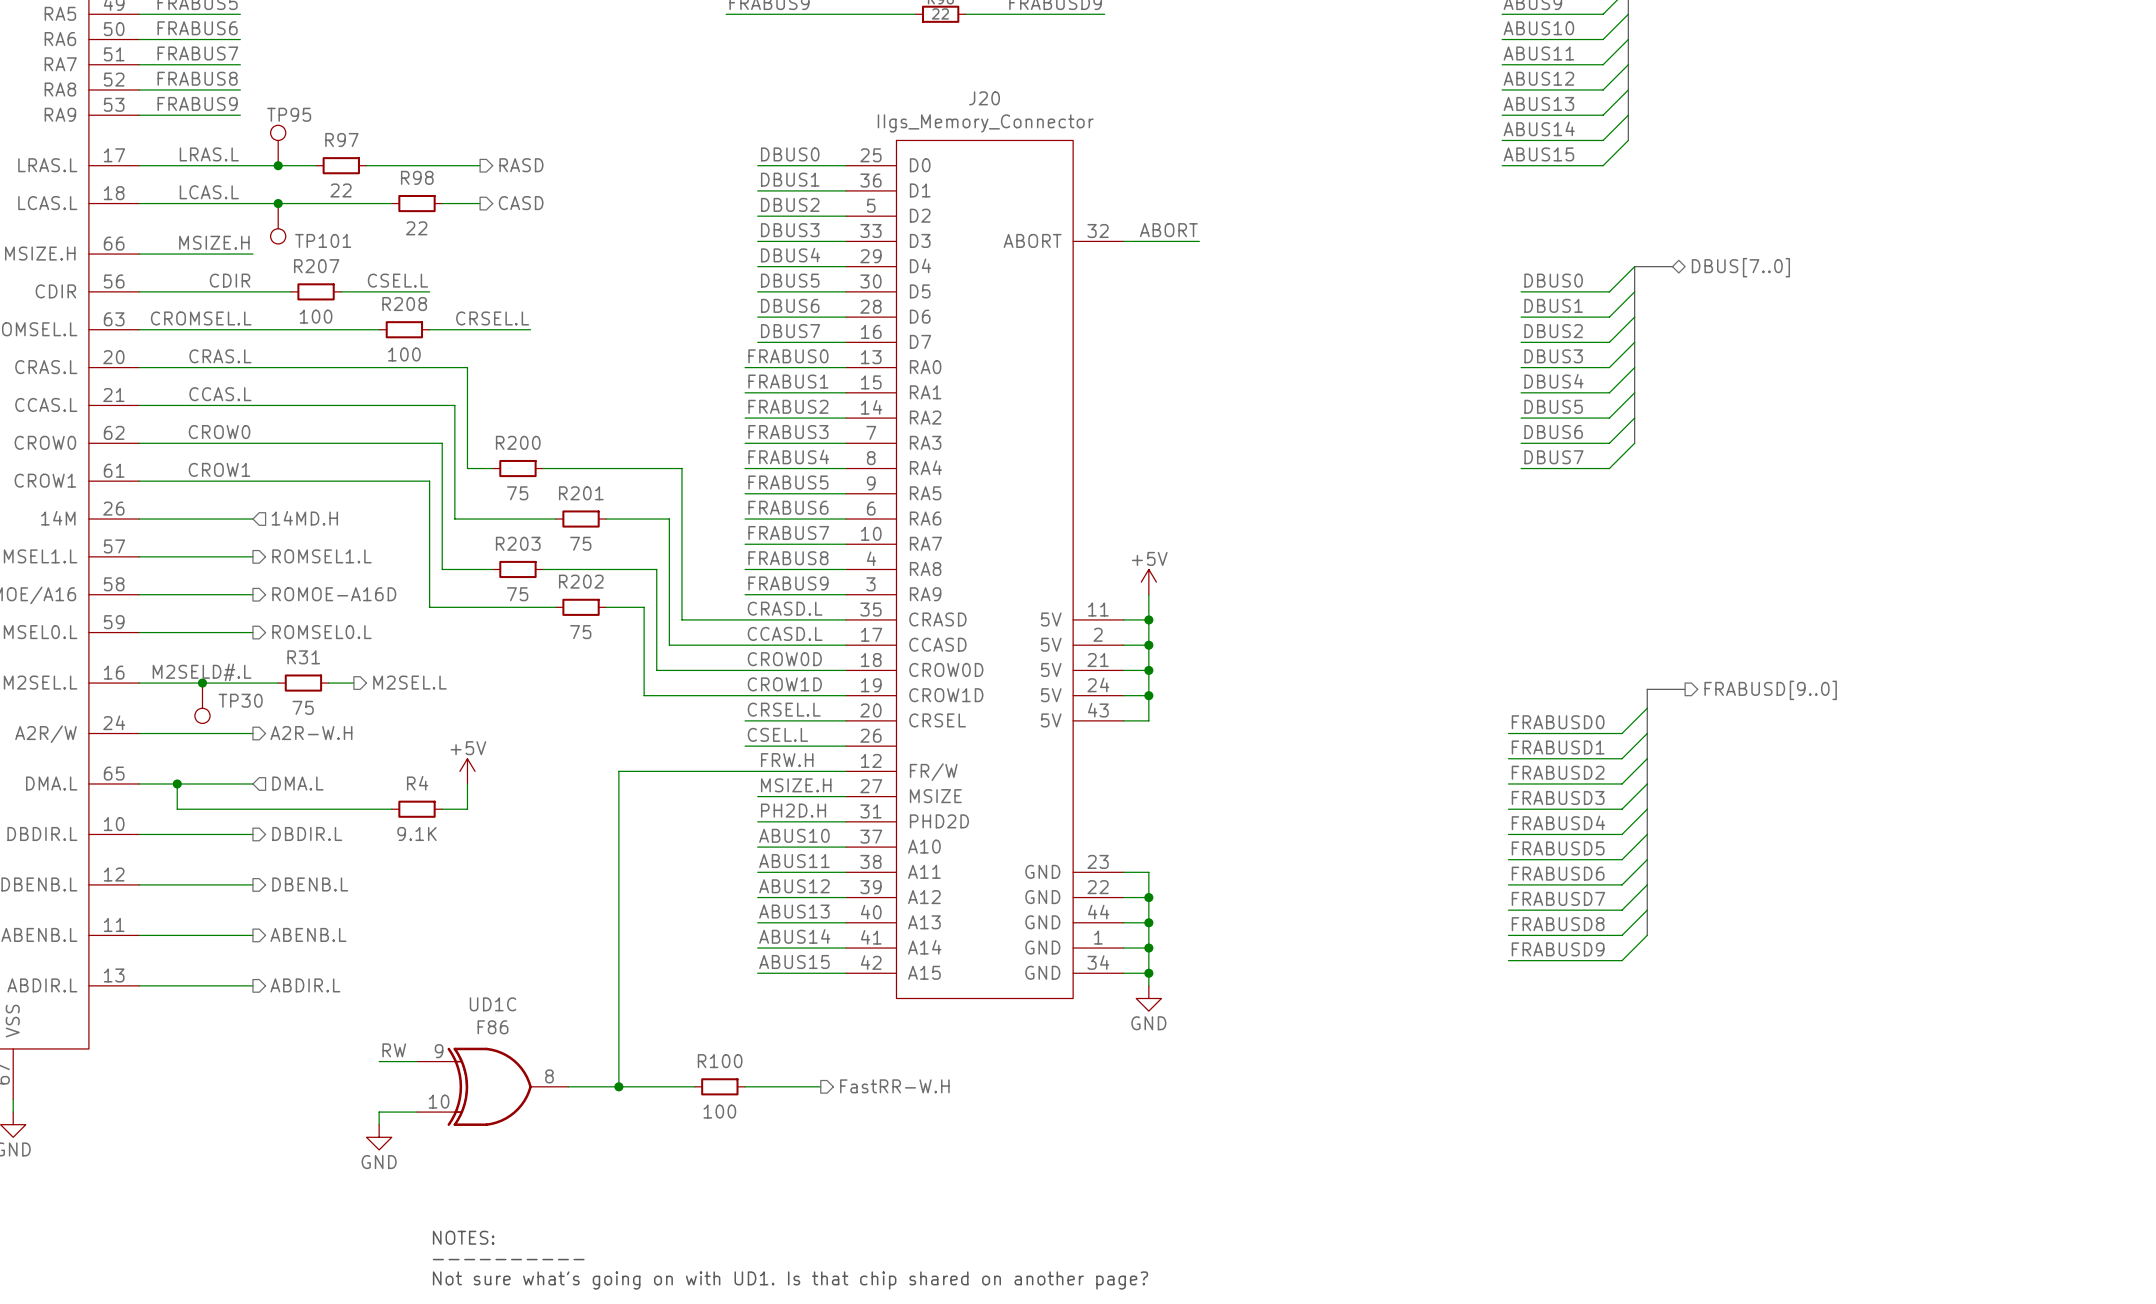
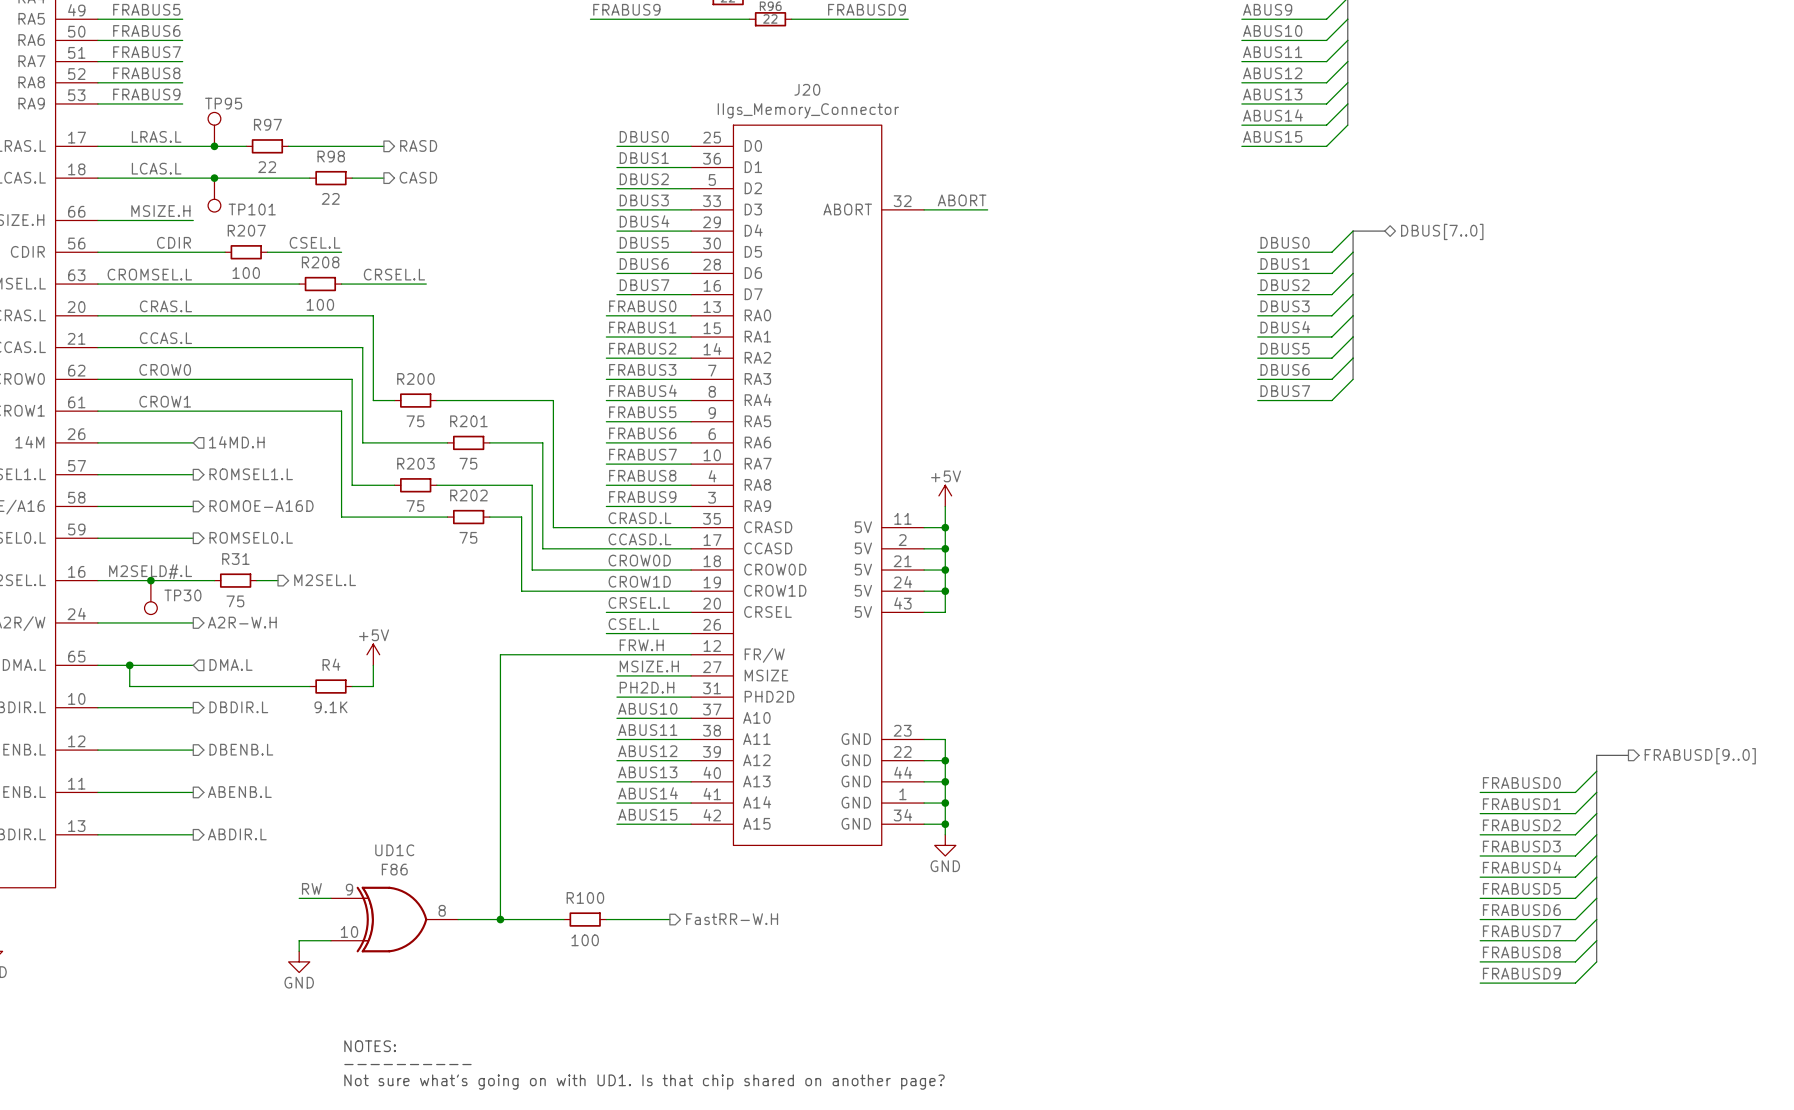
bus: (1685, 689) (1647, 689) (1647, 935) -> none
hierarchical label: FRABUSD[9..0] (1770, 690) -> none
wire: (1647, 708) (1622, 733) (1508, 733) -> none
label: FRABUSD0 (1558, 722) -> none
wire: (1647, 733) (1622, 758) (1508, 758) -> none
label: FRABUSD1 (1558, 747) -> none
wire: (1647, 758) (1622, 783) (1508, 783) -> none
label: FRABUSD2 (1558, 772) -> none
wire: (1647, 783) (1622, 809) (1508, 809) -> none
label: FRABUSD3 (1558, 797) -> none
wire: (1647, 809) (1622, 834) (1508, 834) -> none
label: FRABUSD4 (1558, 822) -> none
wire: (1647, 834) (1622, 859) (1508, 859) -> none
label: FRABUSD5 (1558, 848) -> none
wire: (1647, 859) (1622, 884) (1508, 884) -> none
label: FRABUSD6 (1558, 873) -> none
wire: (1647, 884) (1622, 910) (1508, 910) -> none
bus: none -> (1628, 755) (1596, 755) (1596, 961)
hierarchical label: none -> FRABUSD[9..0] (1700, 756)
label: FRABUSD7 (1558, 898) -> none
wire: (1647, 910) (1622, 935) (1508, 935) -> none
wire: none -> (1596, 771) (1575, 792) (1480, 792)
label: FRABUSD8 (1558, 924) -> none
label: none -> FRABUSD0 (1521, 782)
wire: (1647, 935) (1622, 960) (1508, 960) -> none
wire: none -> (1596, 792) (1575, 813) (1480, 813)
label: FRABUSD9 (1558, 949) -> none
label: none -> FRABUSD1 (1521, 804)
wire: none -> (1596, 813) (1575, 834) (1480, 834)
label: none -> FRABUSD2 (1521, 825)
wire: none -> (1596, 834) (1575, 855) (1480, 855)
label: none -> FRABUSD3 (1521, 846)
wire: none -> (1596, 855) (1575, 877) (1480, 877)
label: none -> FRABUSD4 (1522, 867)
wire: none -> (1596, 877) (1575, 898) (1480, 898)
label: none -> FRABUSD5 (1521, 888)
wire: none -> (1596, 898) (1575, 919) (1480, 919)
label: none -> FRABUSD6 (1521, 910)
wire: none -> (1596, 919) (1575, 940) (1480, 940)
label: none -> FRABUSD7 (1522, 931)
wire: none -> (1596, 940) (1575, 961) (1480, 961)
label: none -> FRABUSD8 (1521, 952)
wire: none -> (1596, 961) (1575, 983) (1480, 983)
label: none -> FRABUSD9 (1521, 973)

